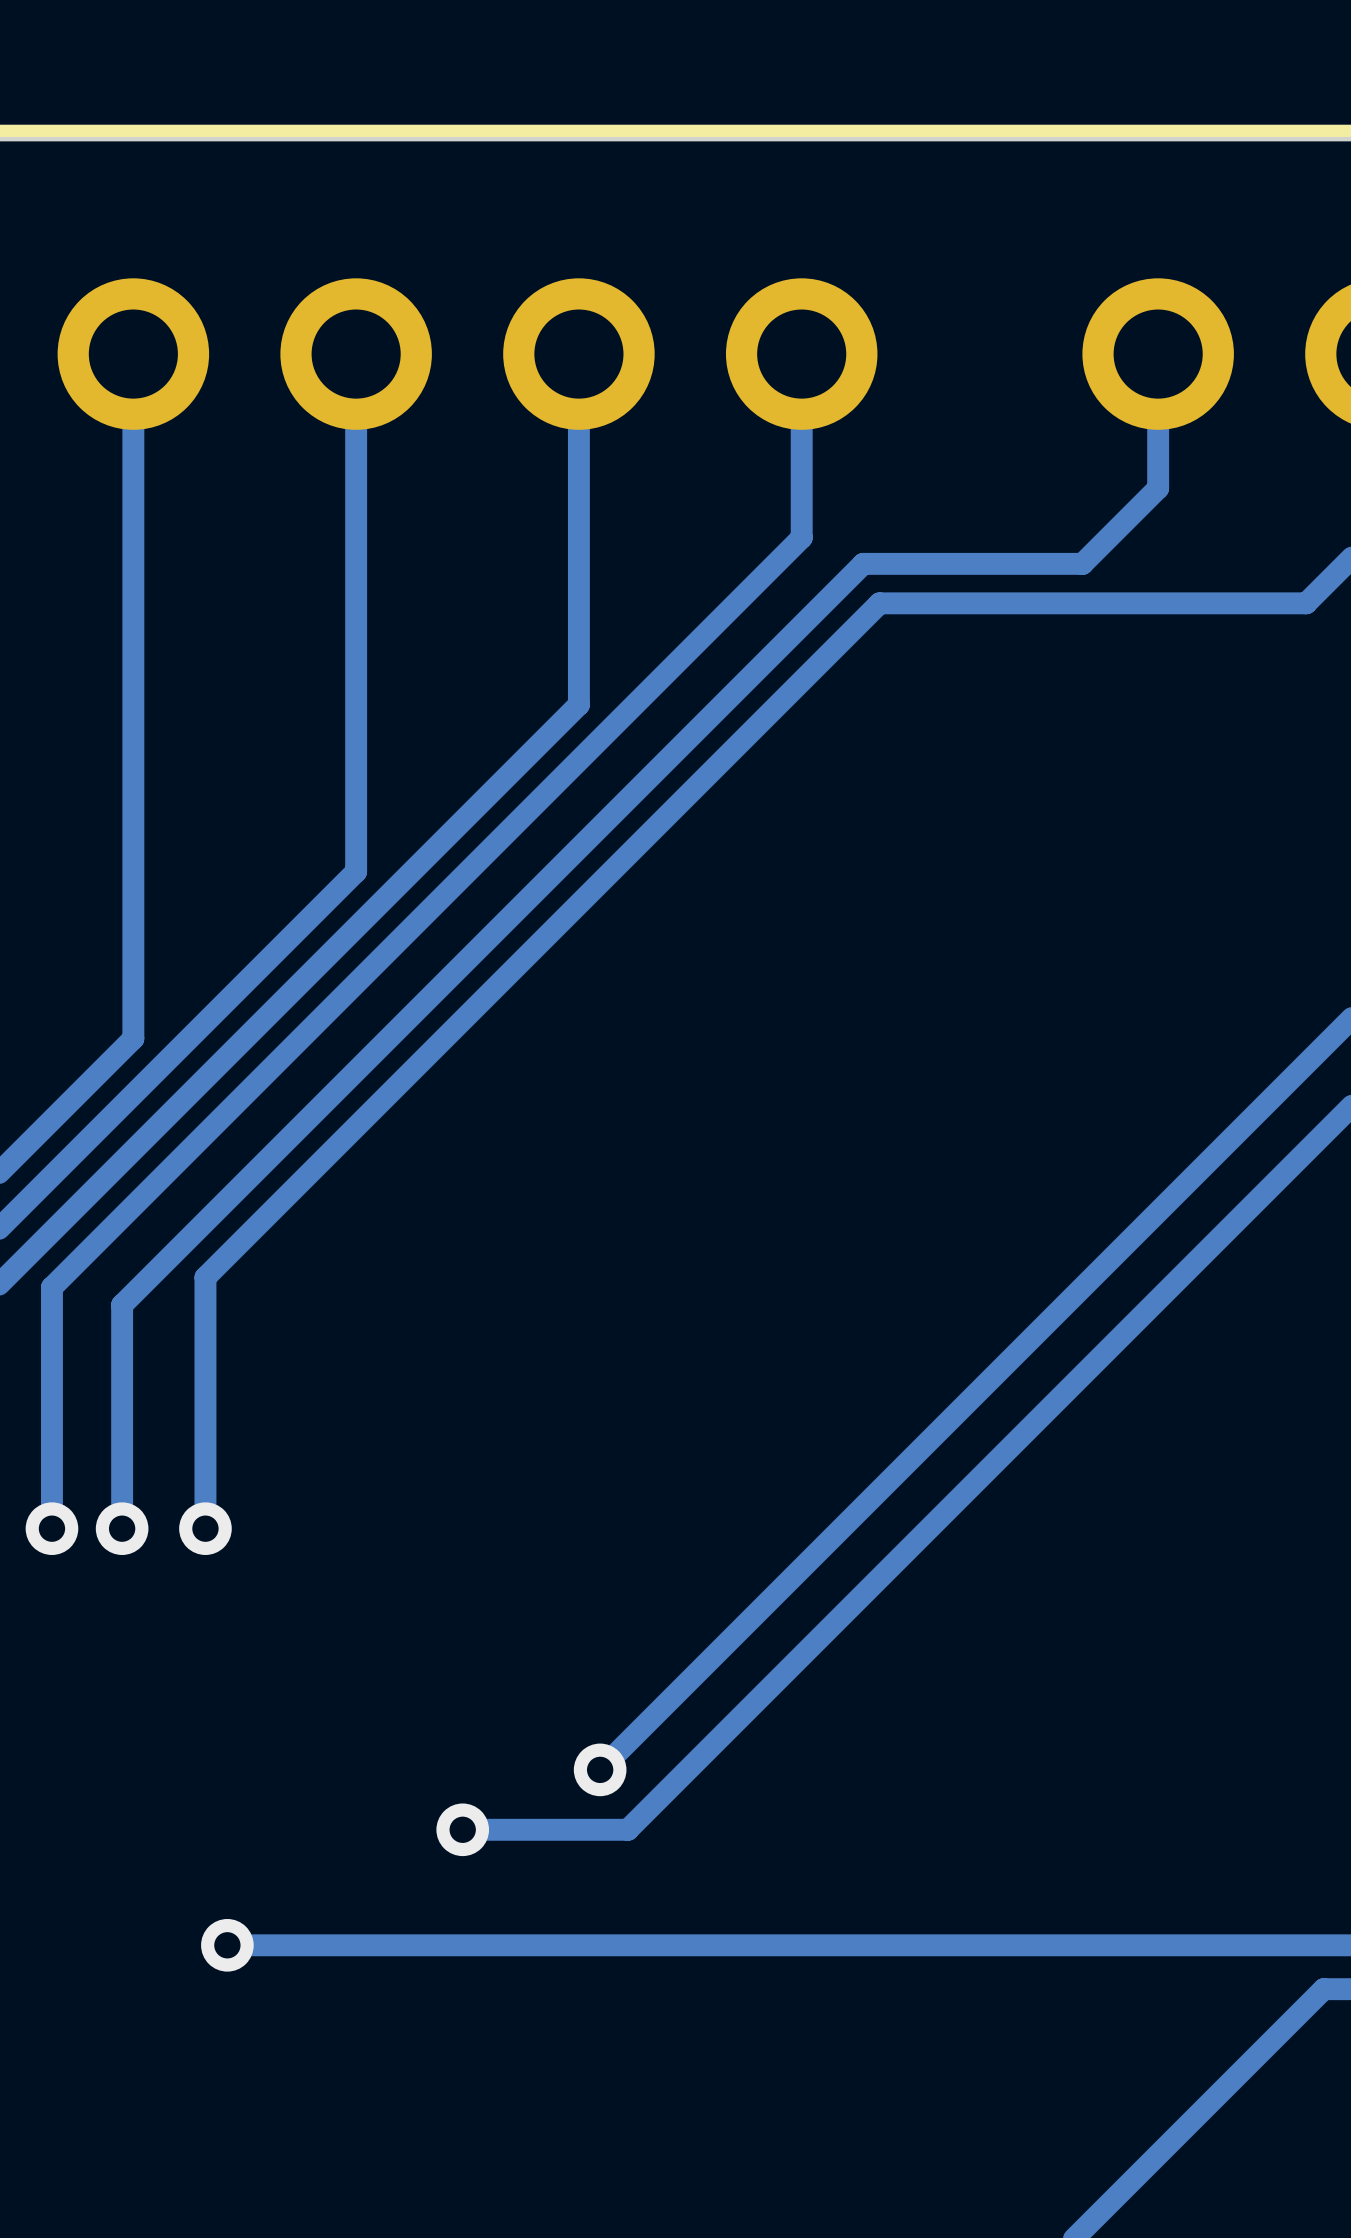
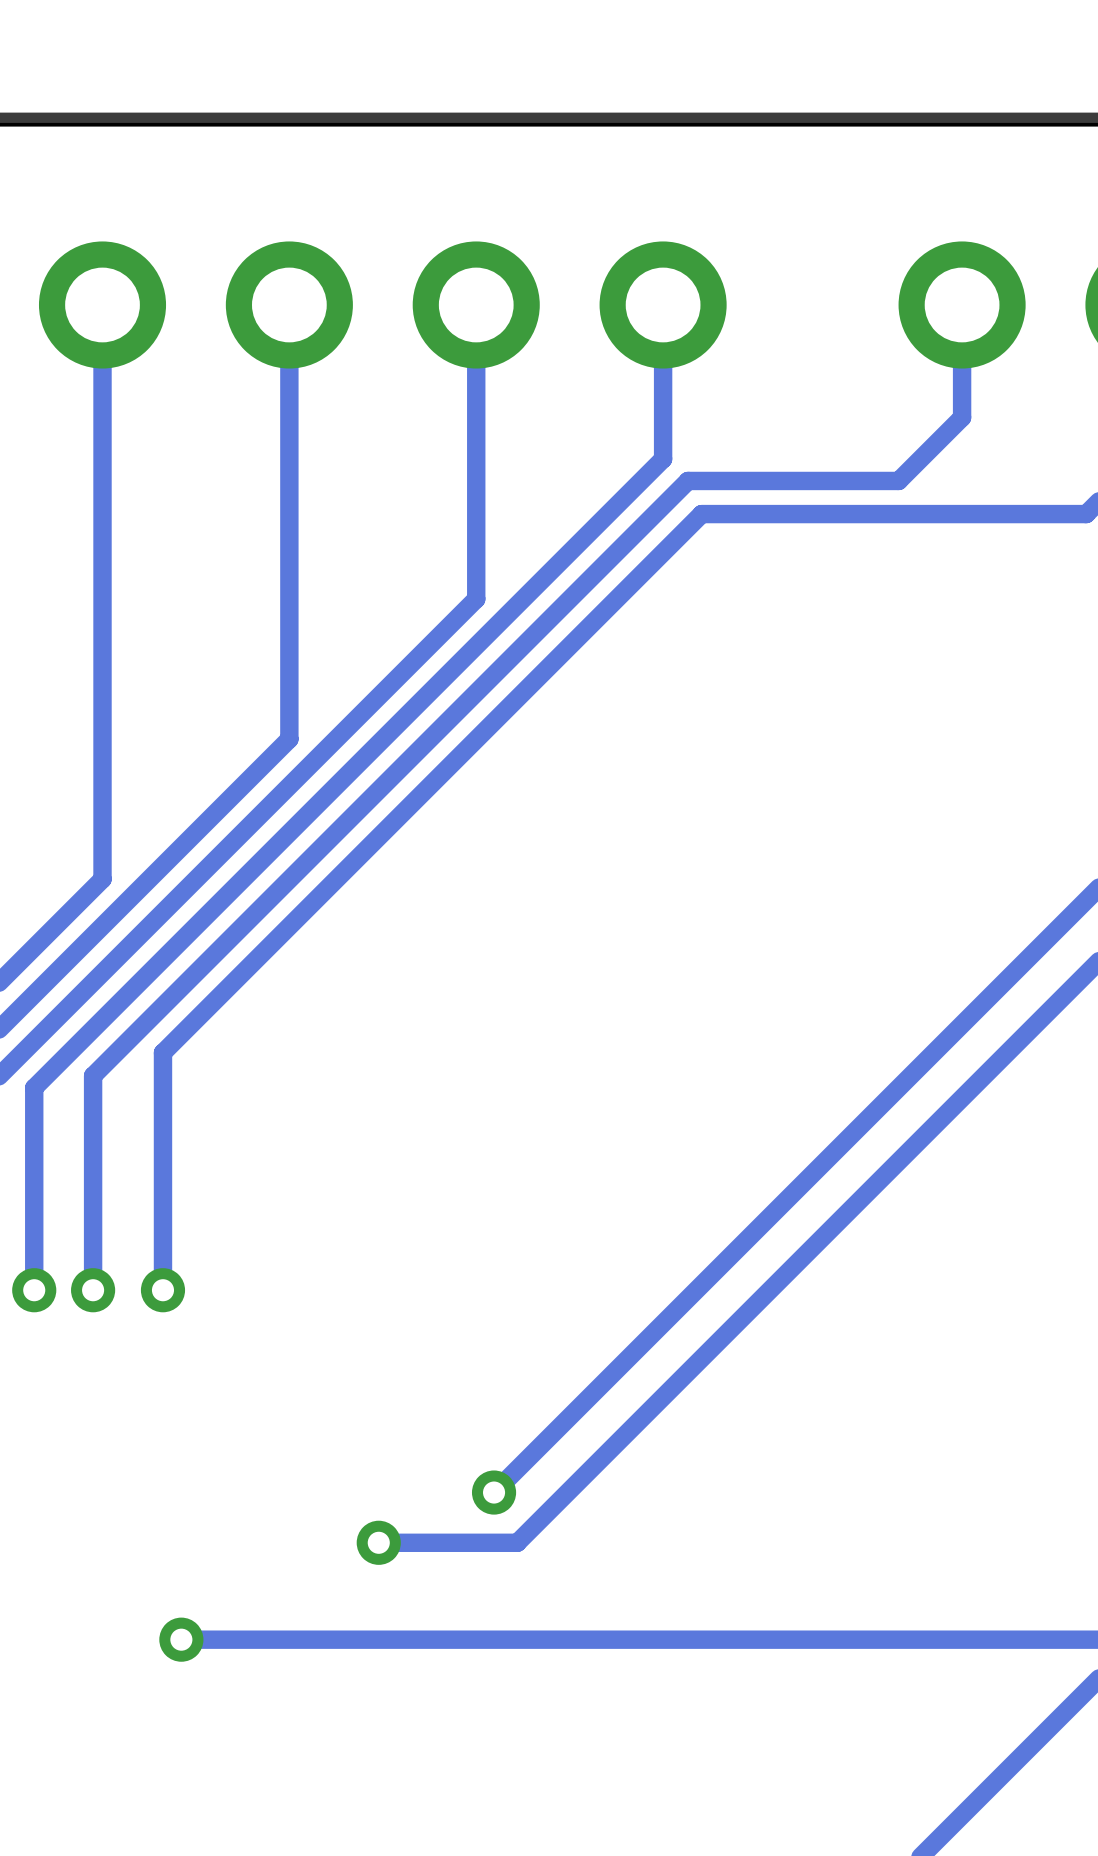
track: (863, 563) (122, 1305) -> (714, 480) (688, 480) (93, 1075) (93, 1102)
track: (879, 603) (205, 1277) -> (728, 514) (701, 514) (162, 1052) (162, 1079)

